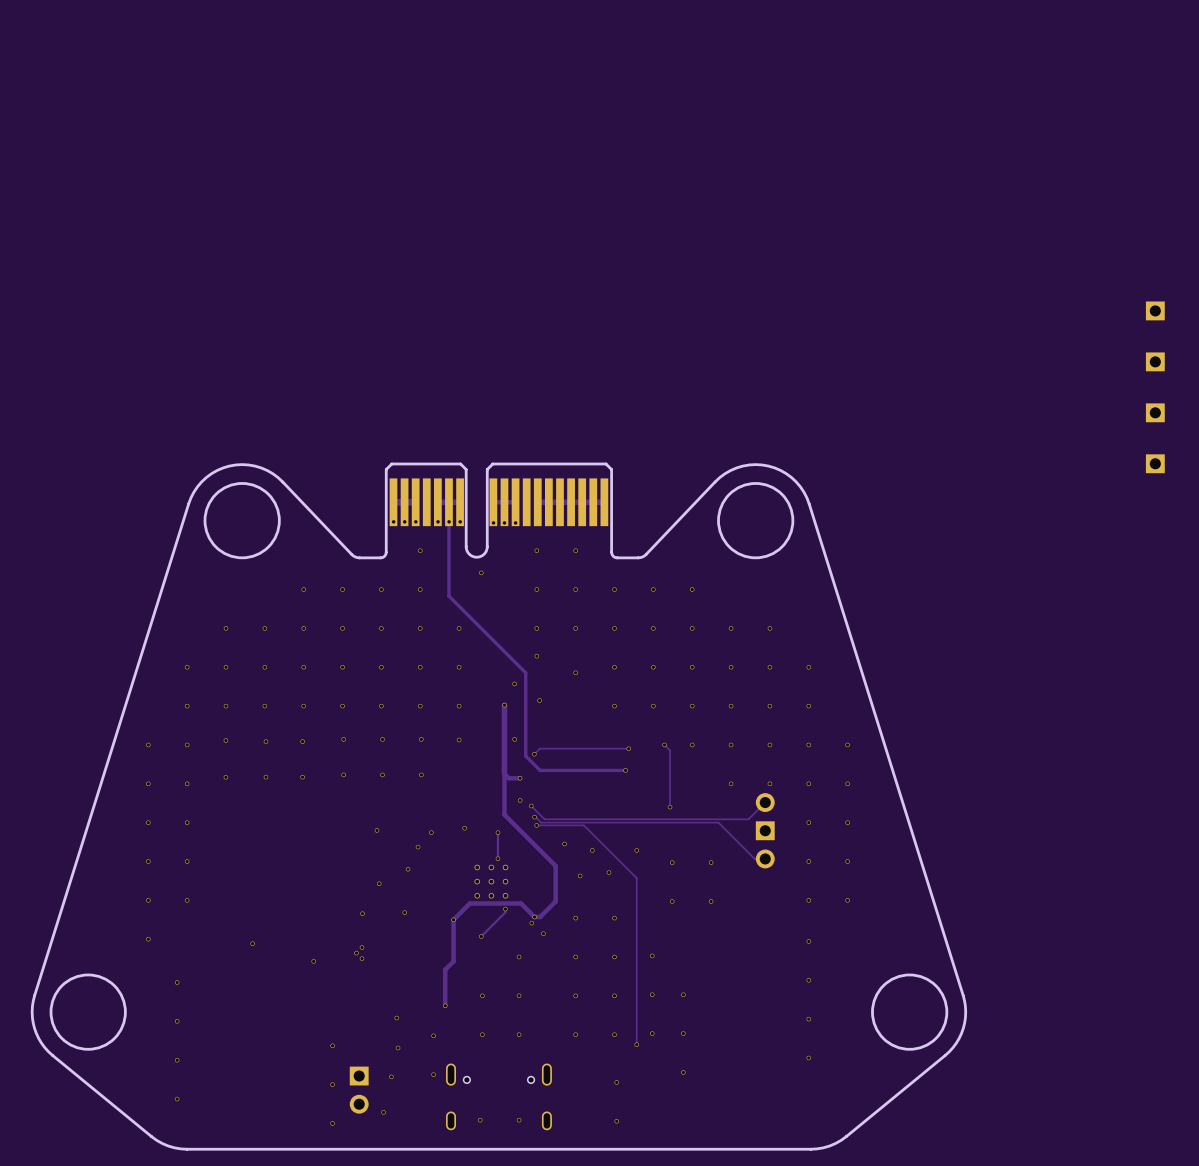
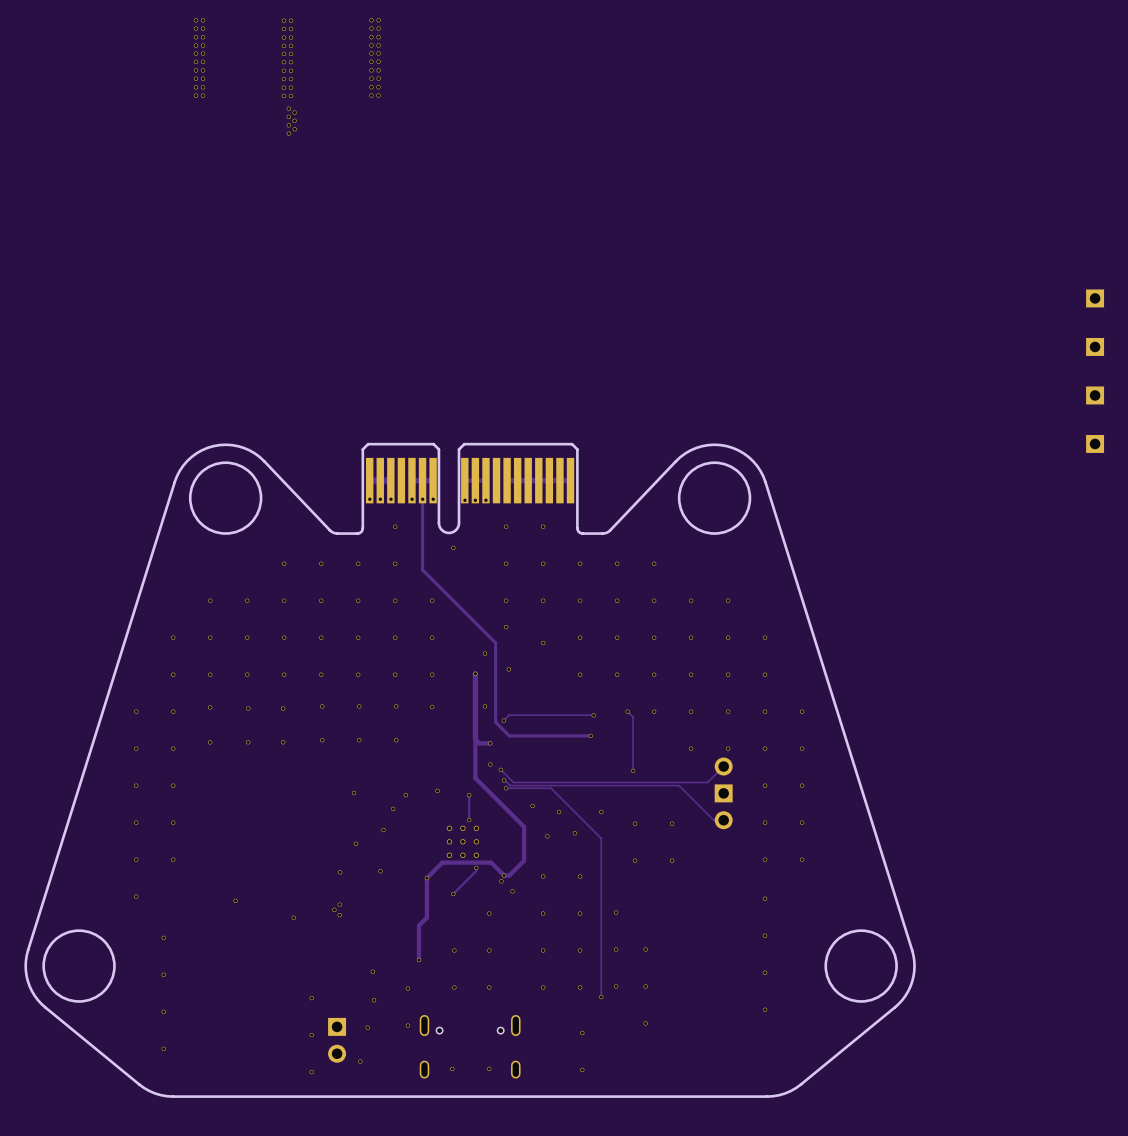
via: none -> (195, 20)
via: none -> (203, 20)
via: none -> (371, 20)
via: none -> (378, 20)
via: none -> (283, 20)
via: none -> (290, 20)
via: none -> (195, 28)
via: none -> (203, 28)
via: none -> (283, 28)
via: none -> (290, 28)
via: none -> (371, 28)
via: none -> (378, 28)
via: none -> (195, 37)
via: none -> (203, 37)
via: none -> (283, 37)
via: none -> (290, 37)
via: none -> (371, 37)
via: none -> (378, 37)
via: none -> (195, 45)
via: none -> (203, 45)
via: none -> (283, 45)
via: none -> (290, 45)
via: none -> (371, 45)
via: none -> (378, 45)
via: none -> (195, 53)
via: none -> (203, 53)
via: none -> (371, 53)
via: none -> (378, 53)
via: none -> (283, 53)
via: none -> (290, 53)
via: none -> (195, 61)
via: none -> (203, 61)
via: none -> (283, 62)
via: none -> (290, 62)
via: none -> (371, 61)
via: none -> (378, 61)
via: none -> (195, 70)
via: none -> (203, 70)
via: none -> (283, 70)
via: none -> (290, 70)
via: none -> (371, 70)
via: none -> (378, 70)
via: none -> (195, 78)
via: none -> (203, 78)
via: none -> (283, 79)
via: none -> (290, 79)
via: none -> (371, 78)
via: none -> (378, 78)
via: none -> (195, 87)
via: none -> (202, 87)
via: none -> (283, 87)
via: none -> (290, 87)
via: none -> (371, 87)
via: none -> (378, 87)
via: none -> (195, 95)
via: none -> (202, 95)
via: none -> (371, 95)
via: none -> (378, 95)
via: none -> (283, 95)
via: none -> (290, 95)
via: none -> (288, 108)
via: none -> (294, 112)
via: none -> (288, 116)
via: none -> (294, 120)
via: none -> (288, 125)
via: none -> (294, 129)
via: none -> (288, 133)

